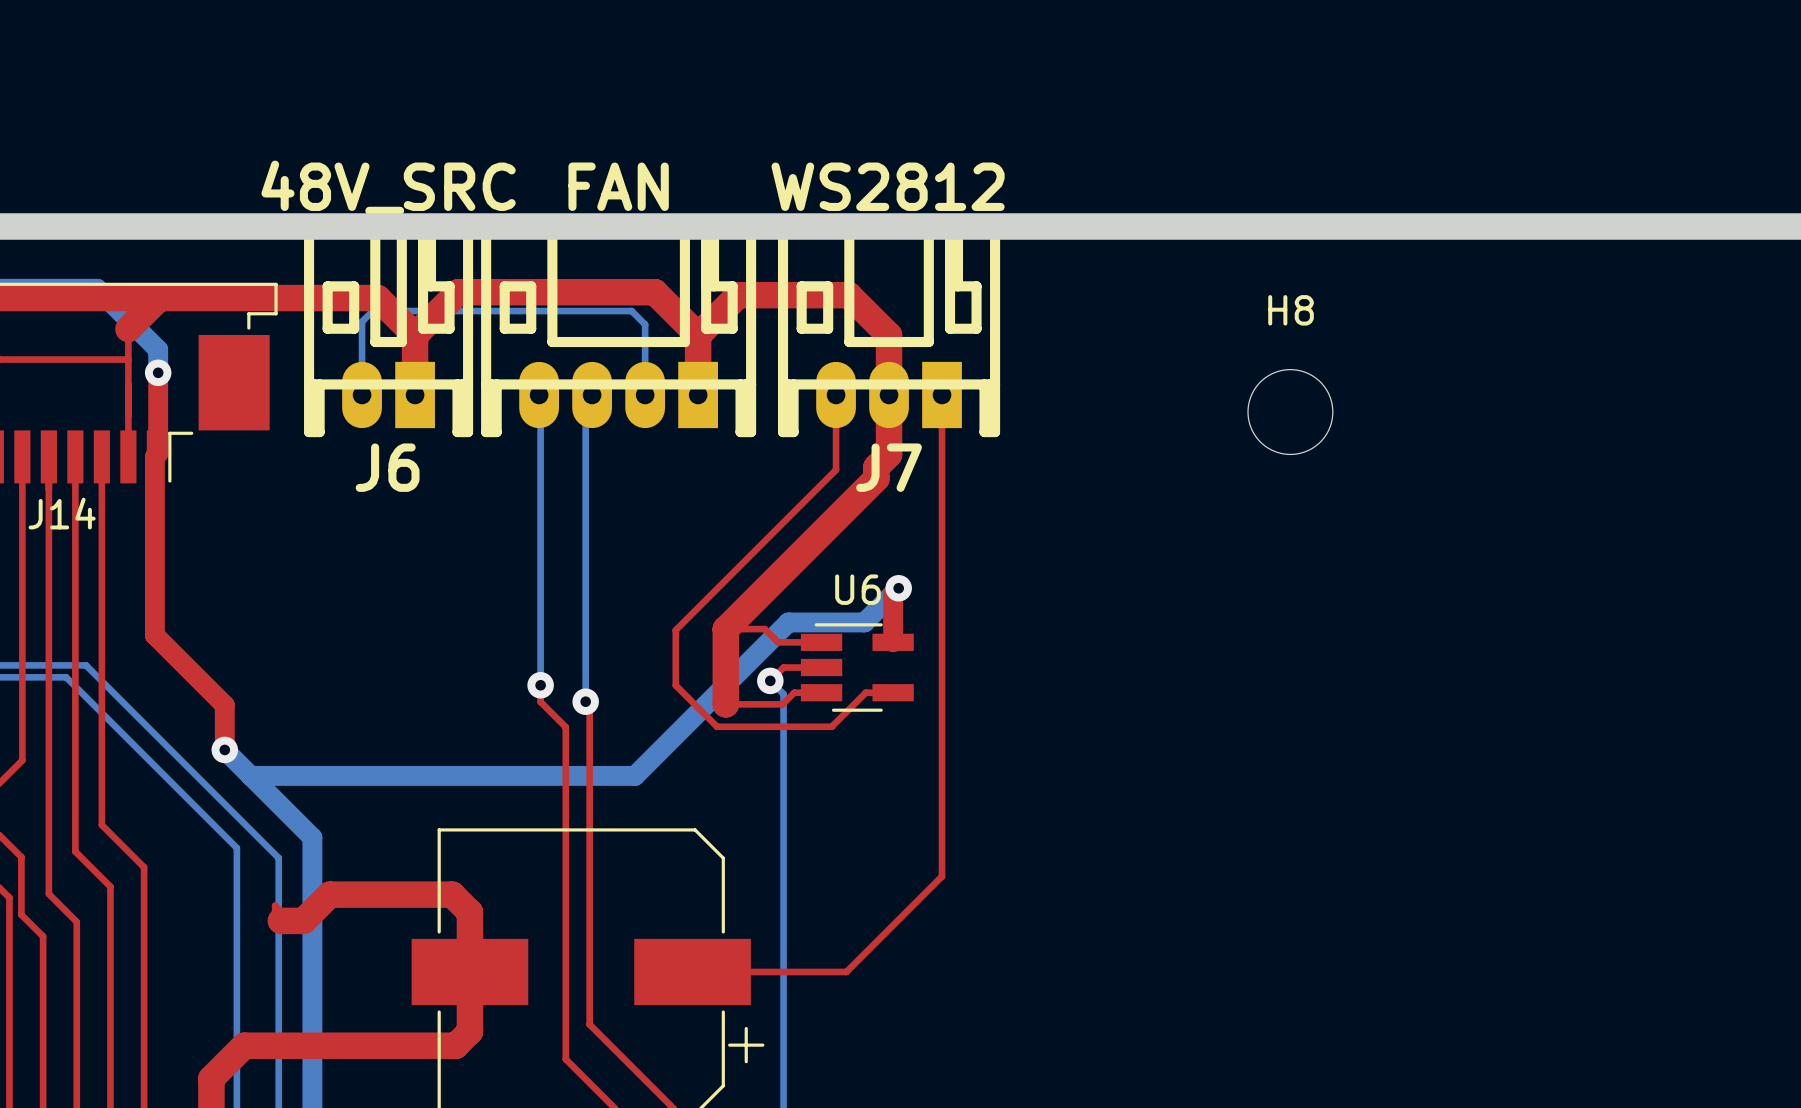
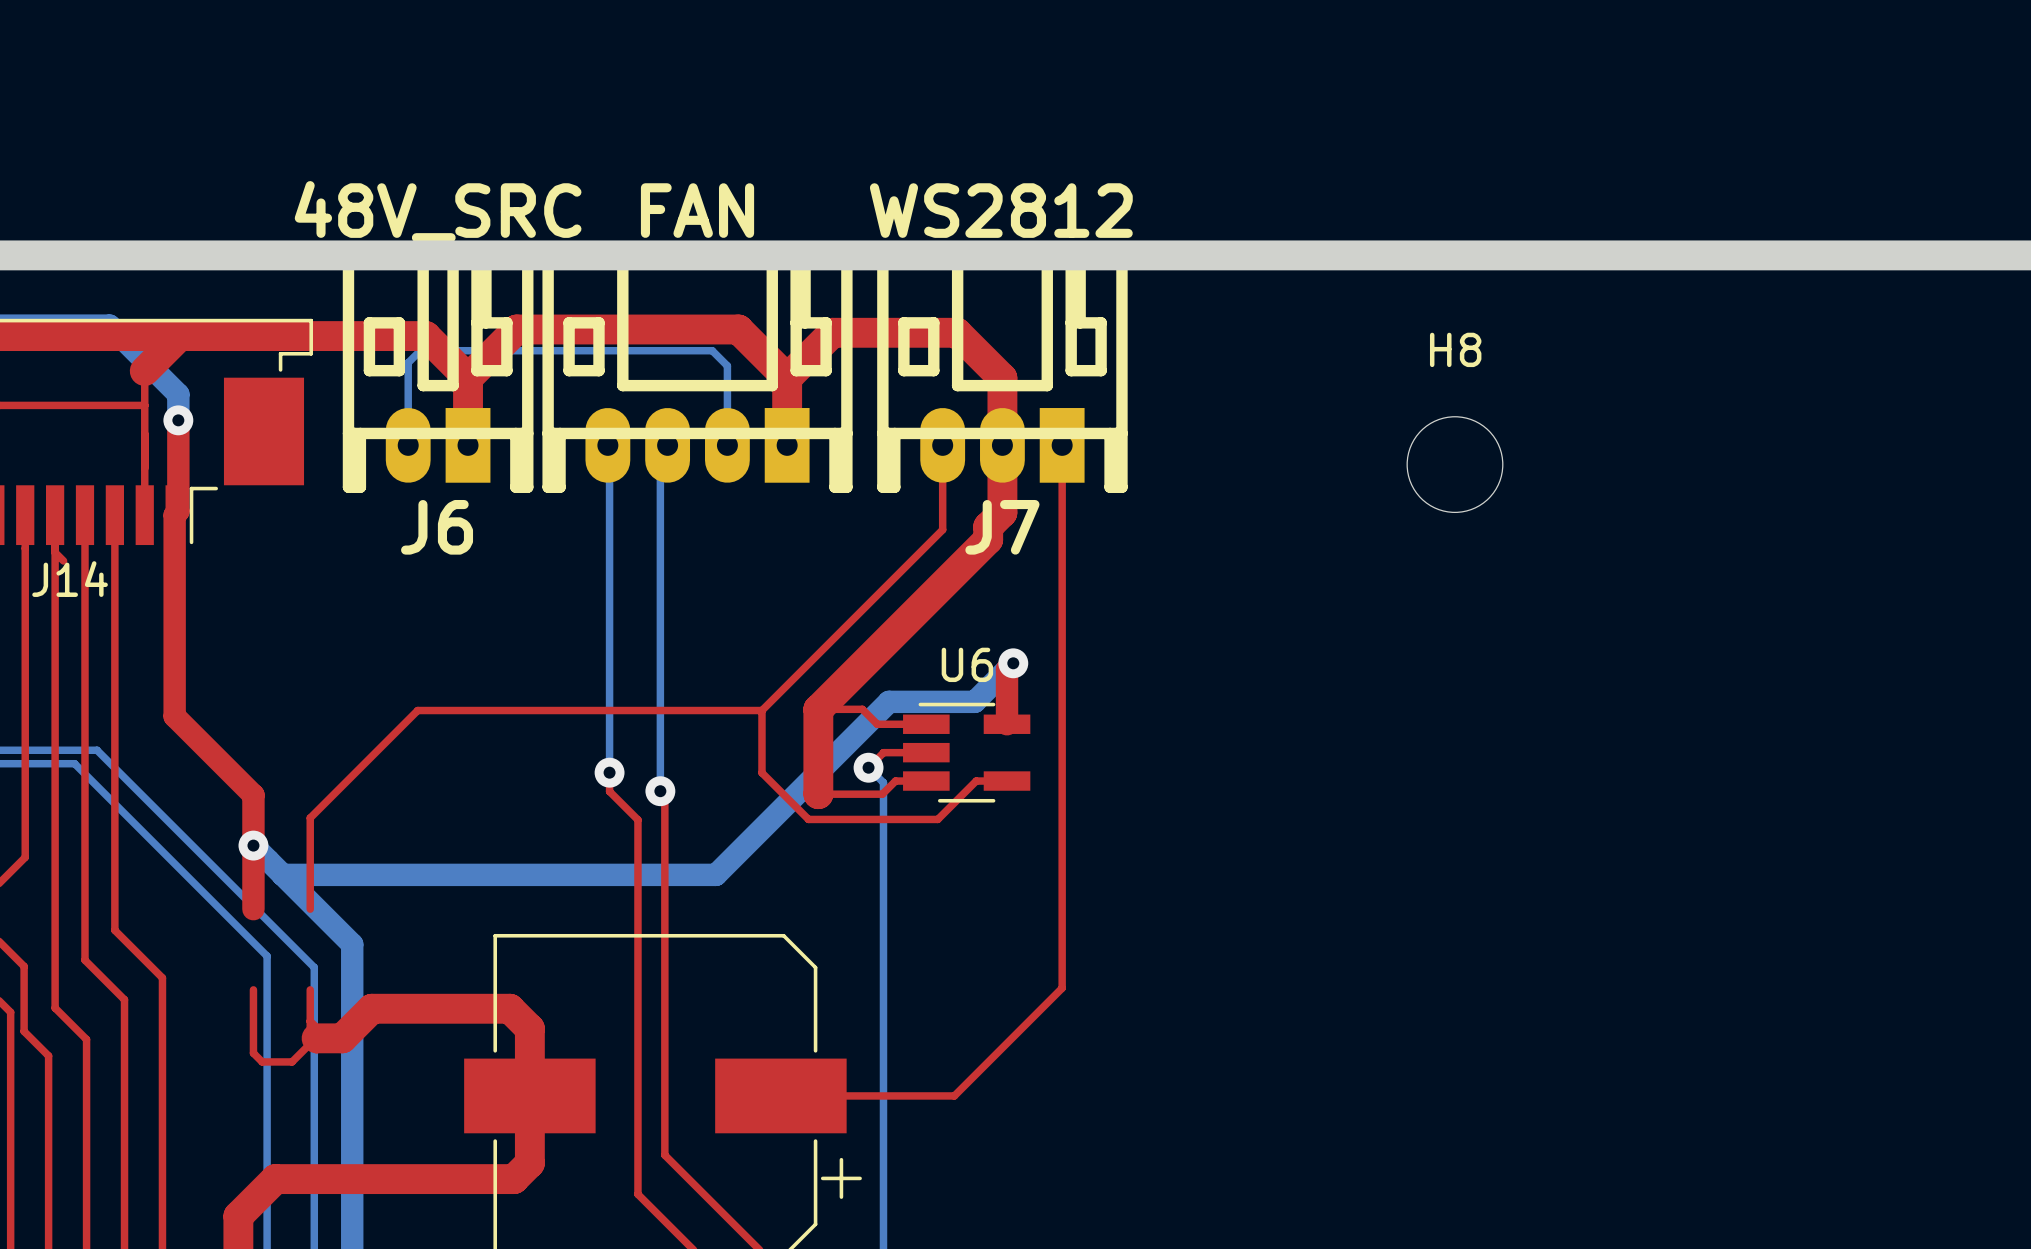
top track: none -> (55, 552) (63, 560)
top track: none -> (761, 710) (417, 710) (310, 818) (310, 909)
top track: none -> (253, 845) (253, 909)
top track: none -> (253, 989) (253, 1053) (262, 1061) (292, 1061) (310, 1043)
top track: none -> (310, 989) (310, 1021)

